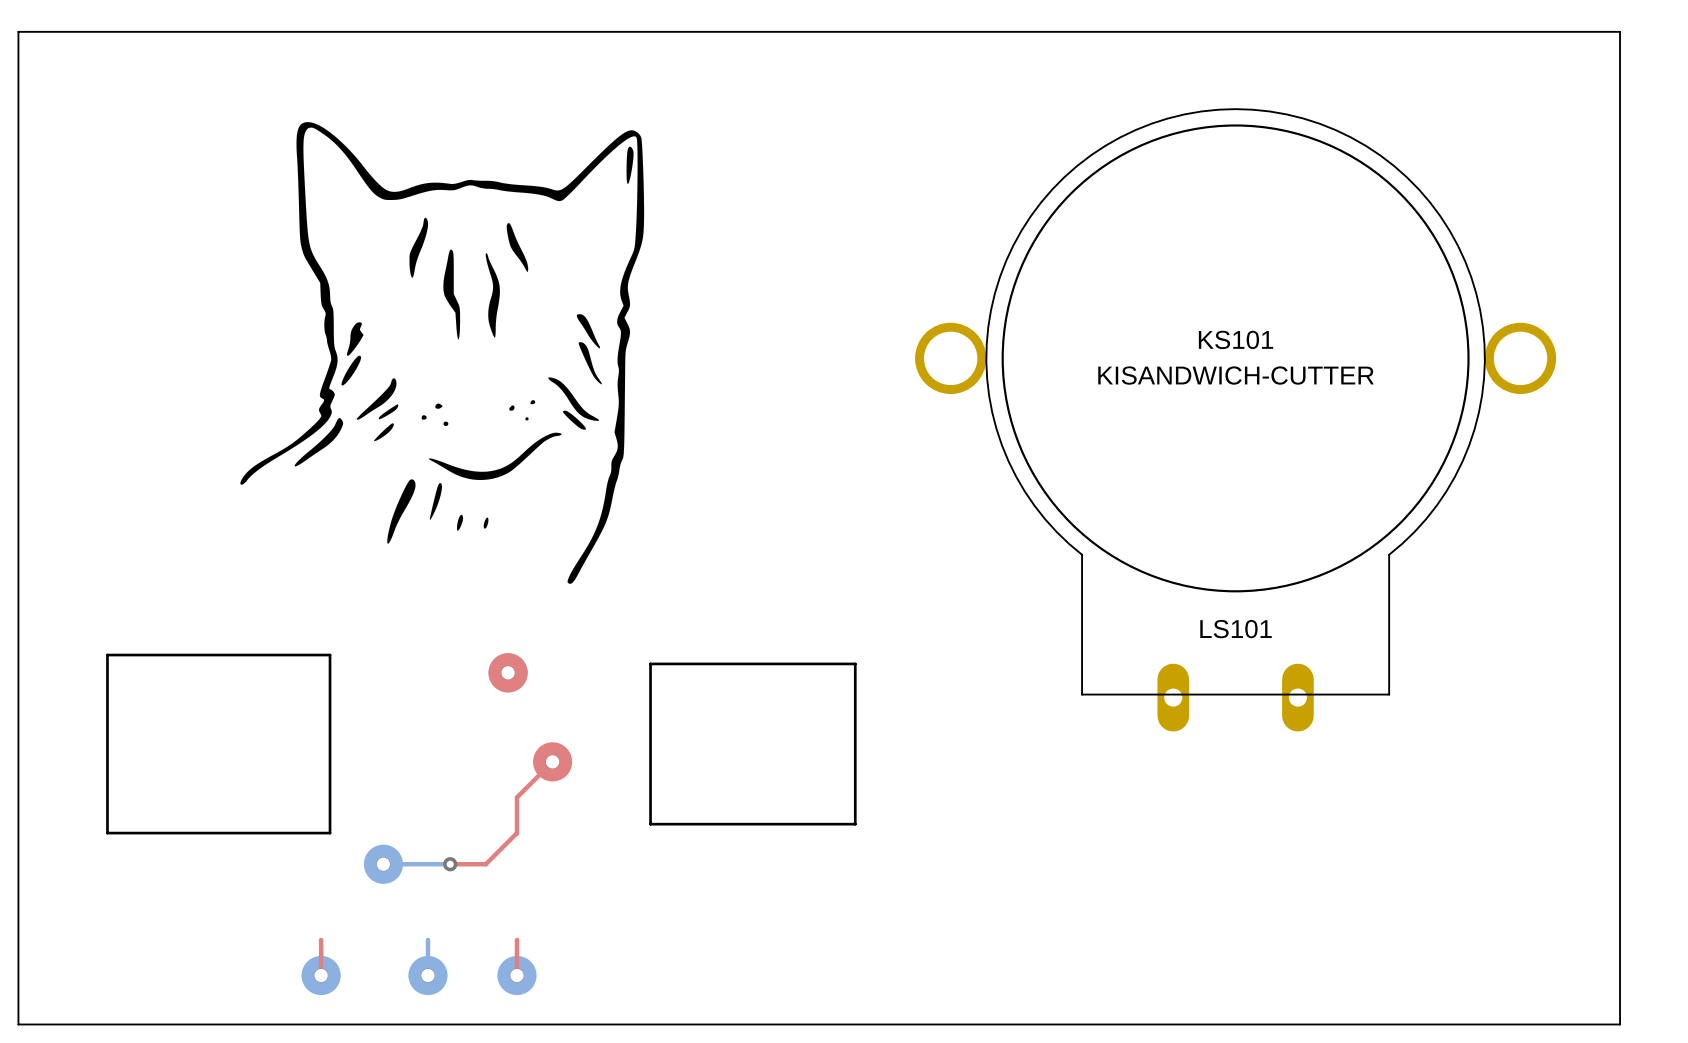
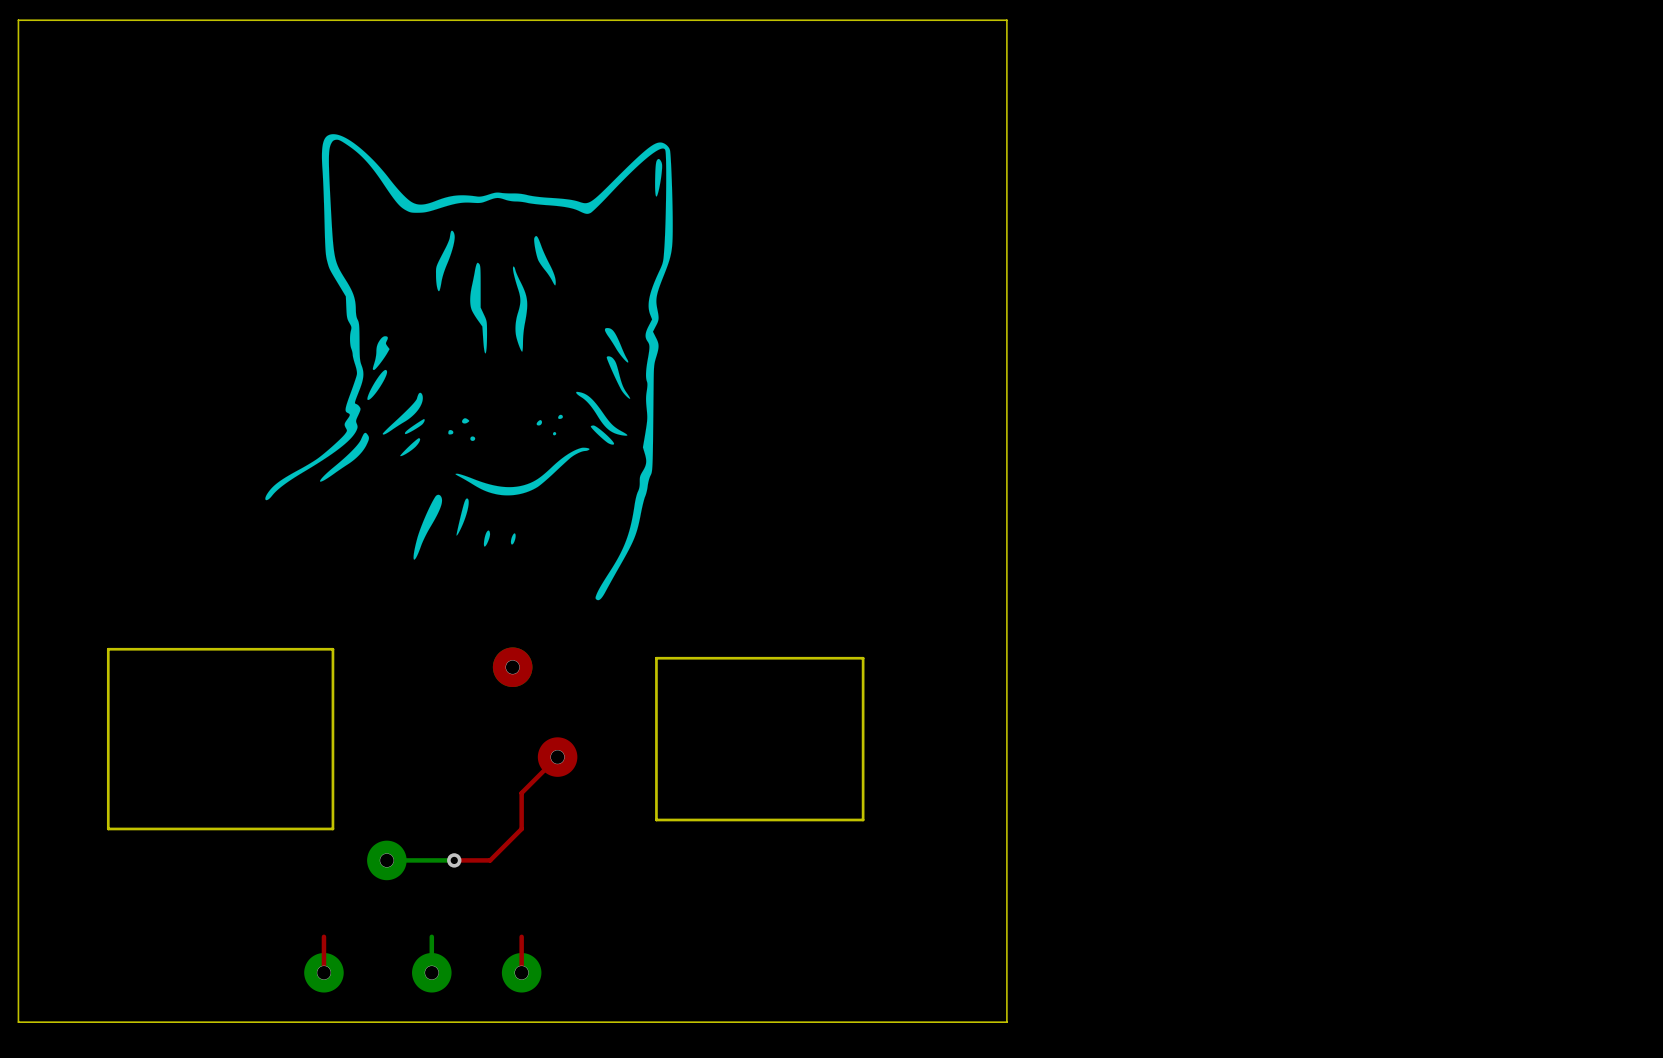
board edge: (997, 31) (1620, 31) (1620, 1024) (997, 1024) -> (1006, 20) (1006, 1022)
drawing position: (442, 352) -> (469, 367)
KS101: KISANDWICH-CUTTER (1235, 401) -> none
LS101: (1235, 427) -> none

